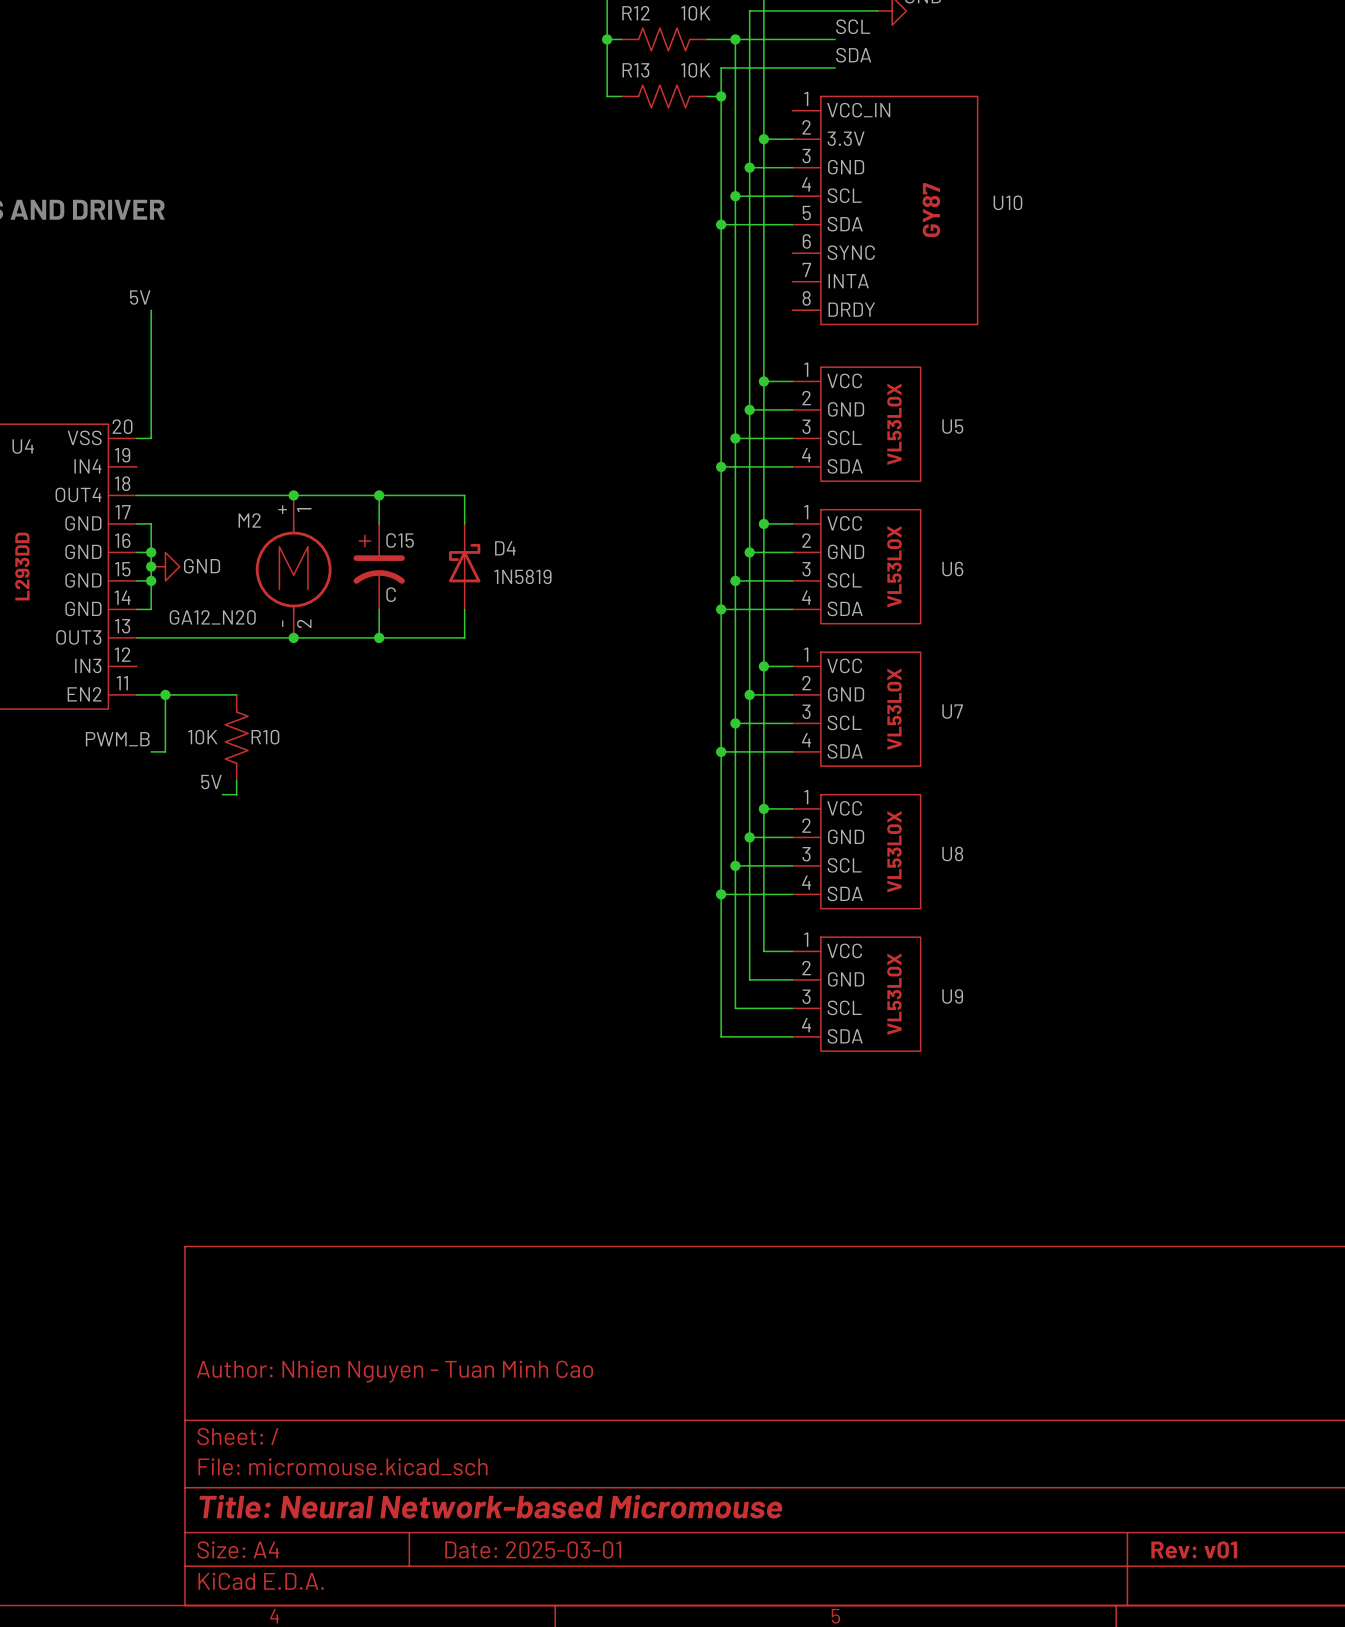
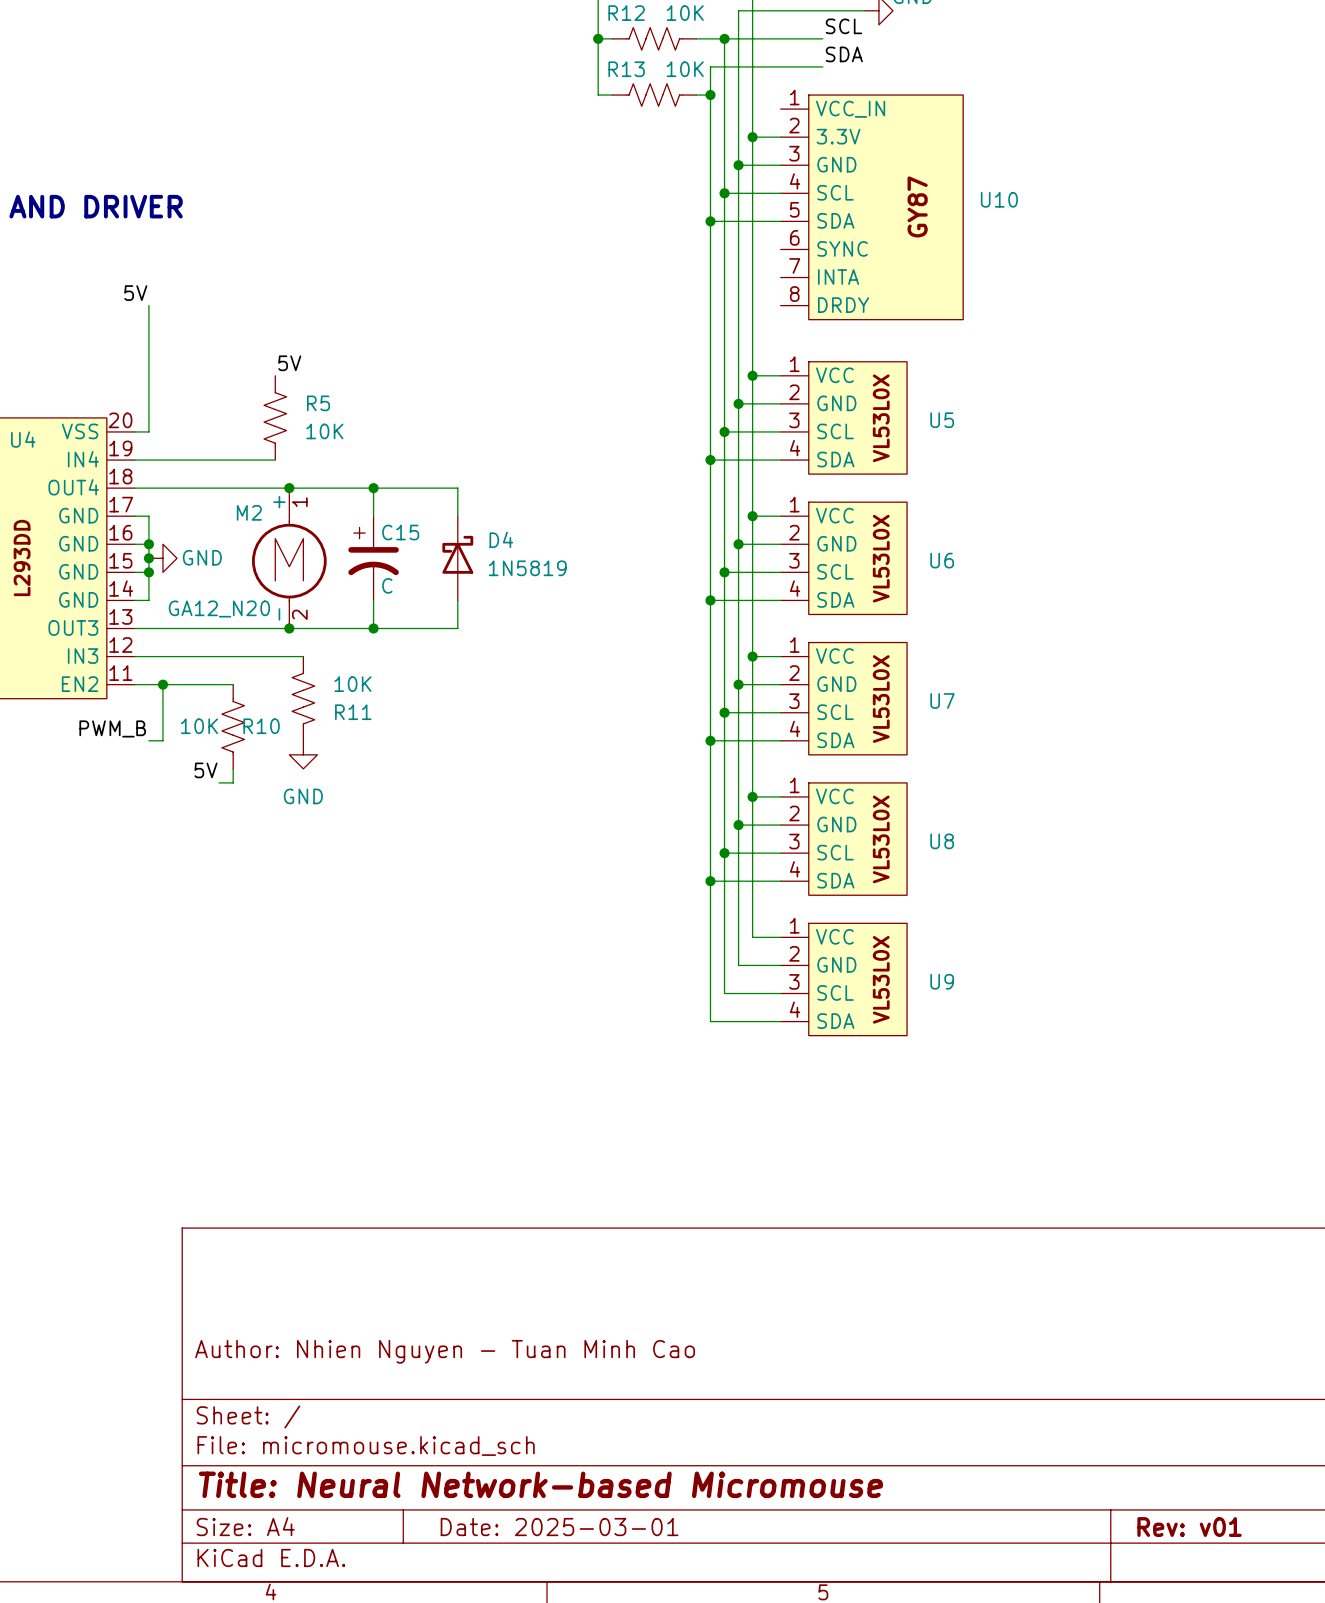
label: none -> 5V (289, 363)
R5: none -> 10K (275, 417)
wire: none -> (134, 460) (275, 460)
wire: none -> (134, 656) (303, 656)
R11: none -> 10K (303, 698)
power symbol: none -> GND (303, 754)

